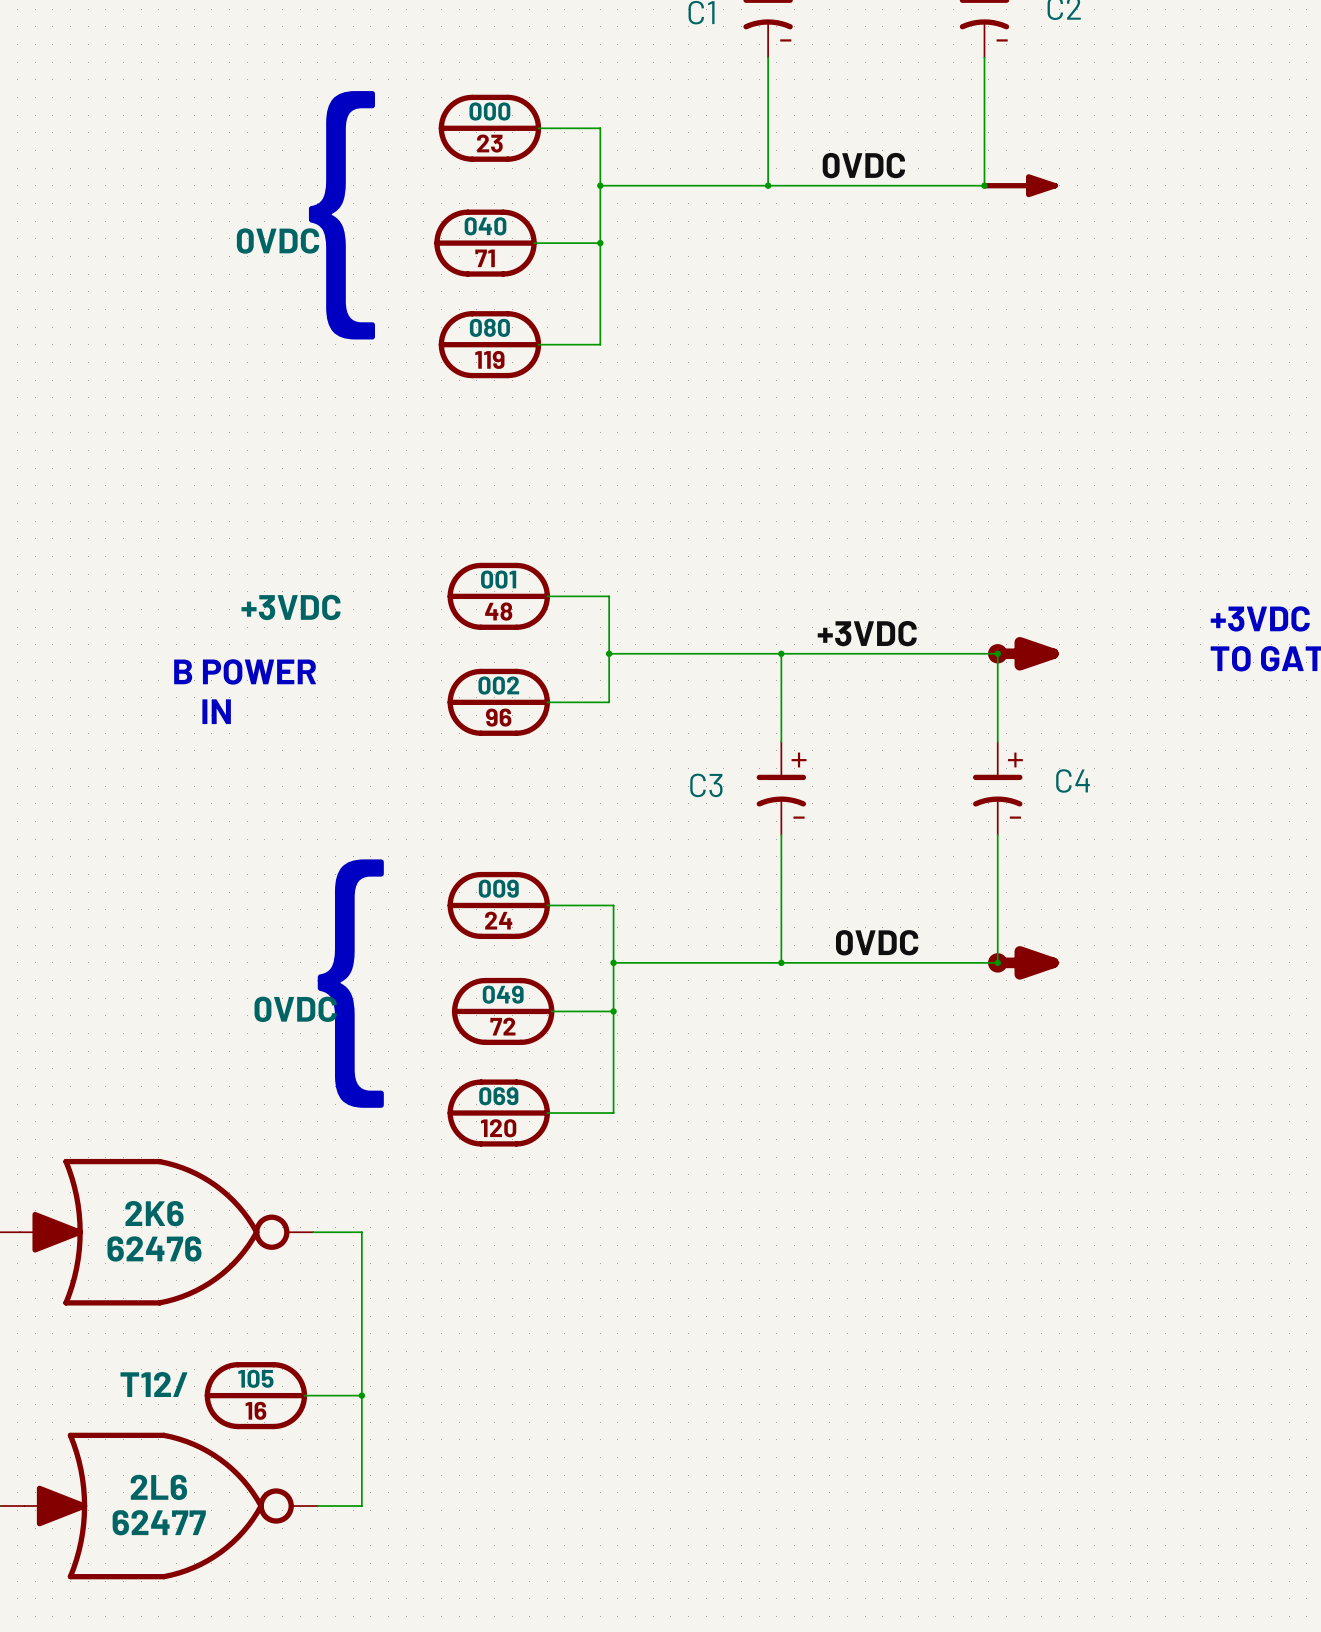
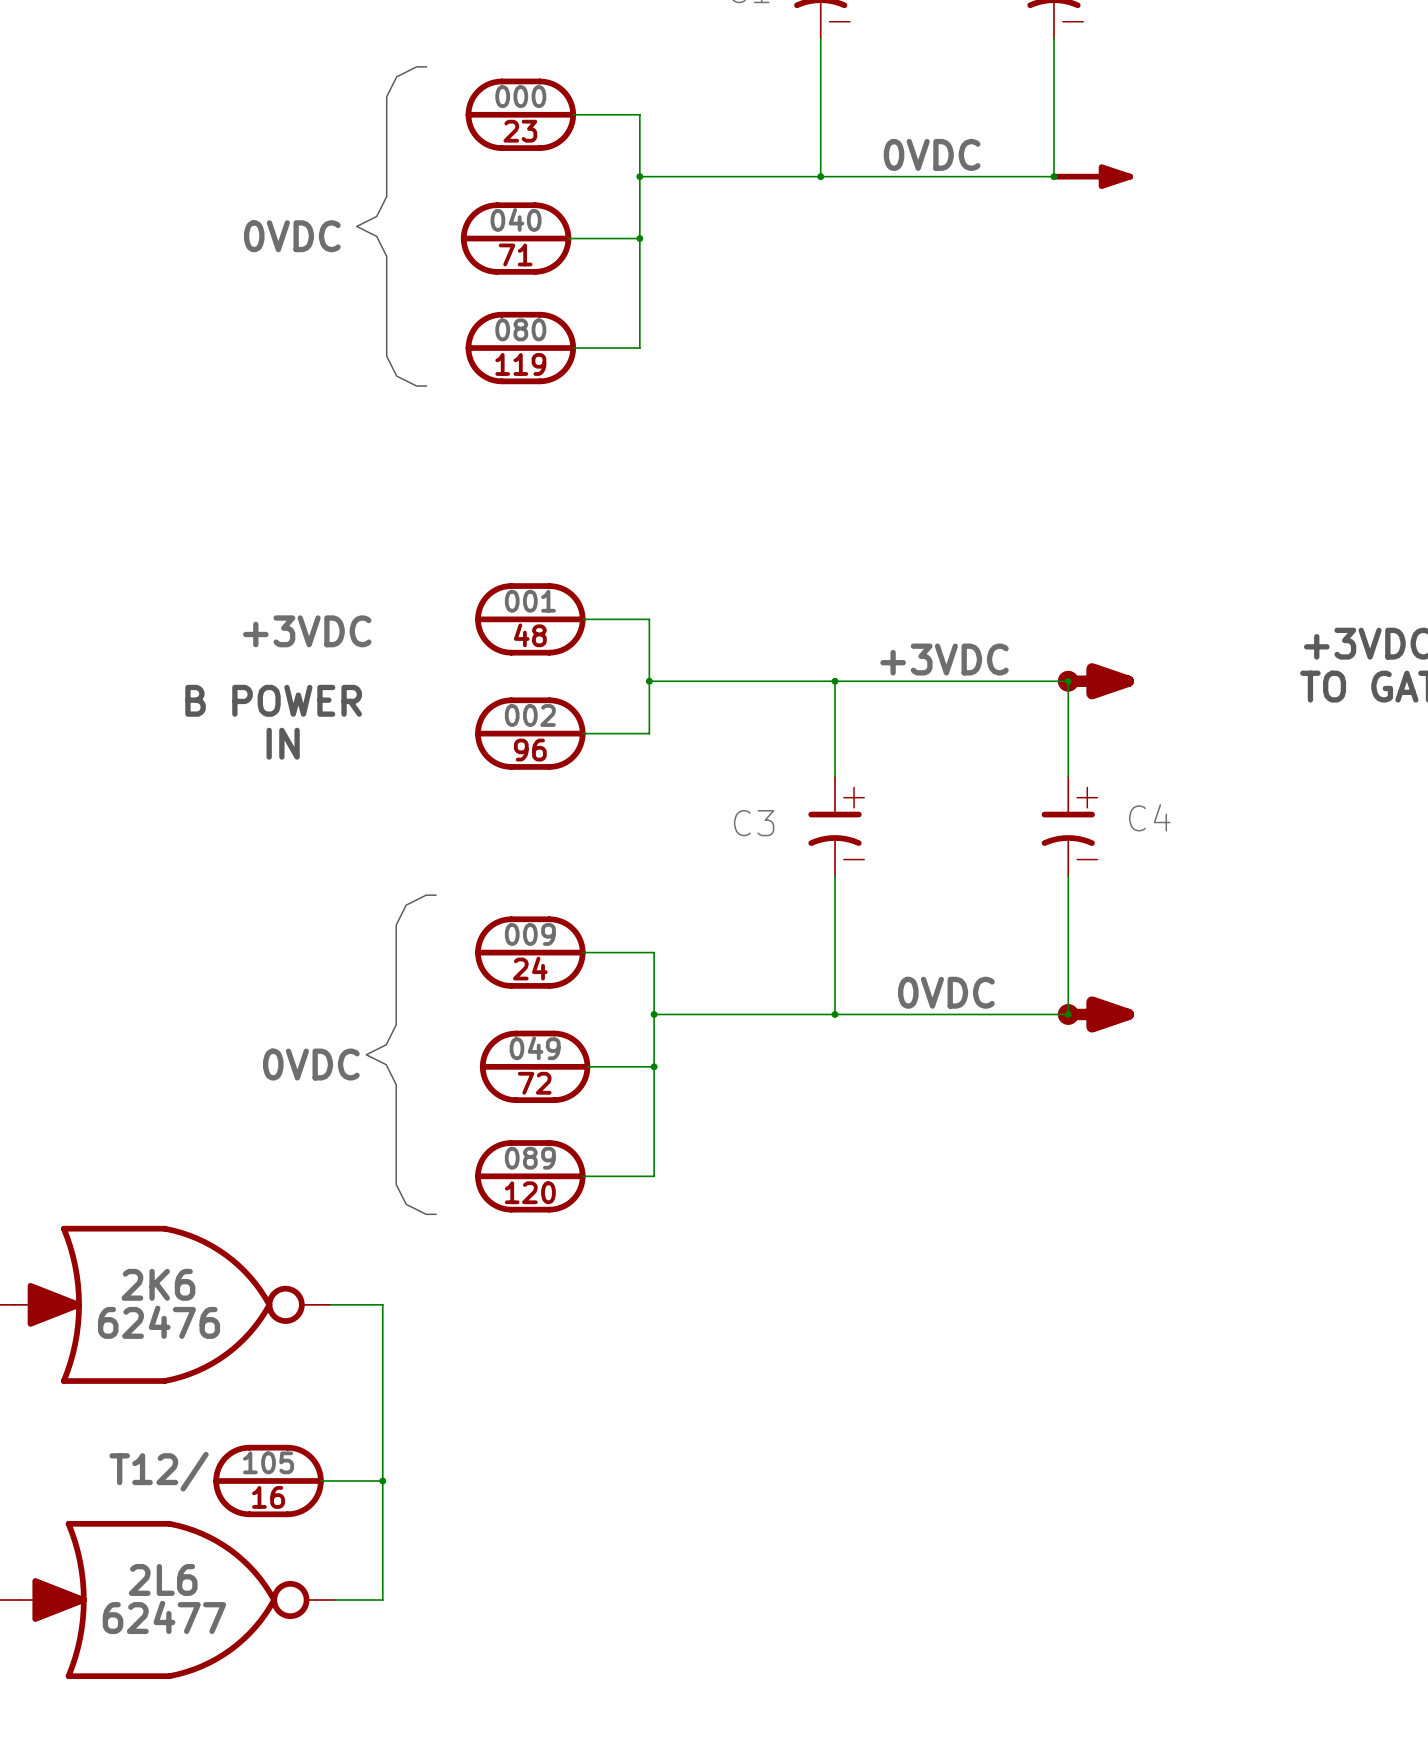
part text: 069 (498, 1096) -> 089 (530, 1158)

